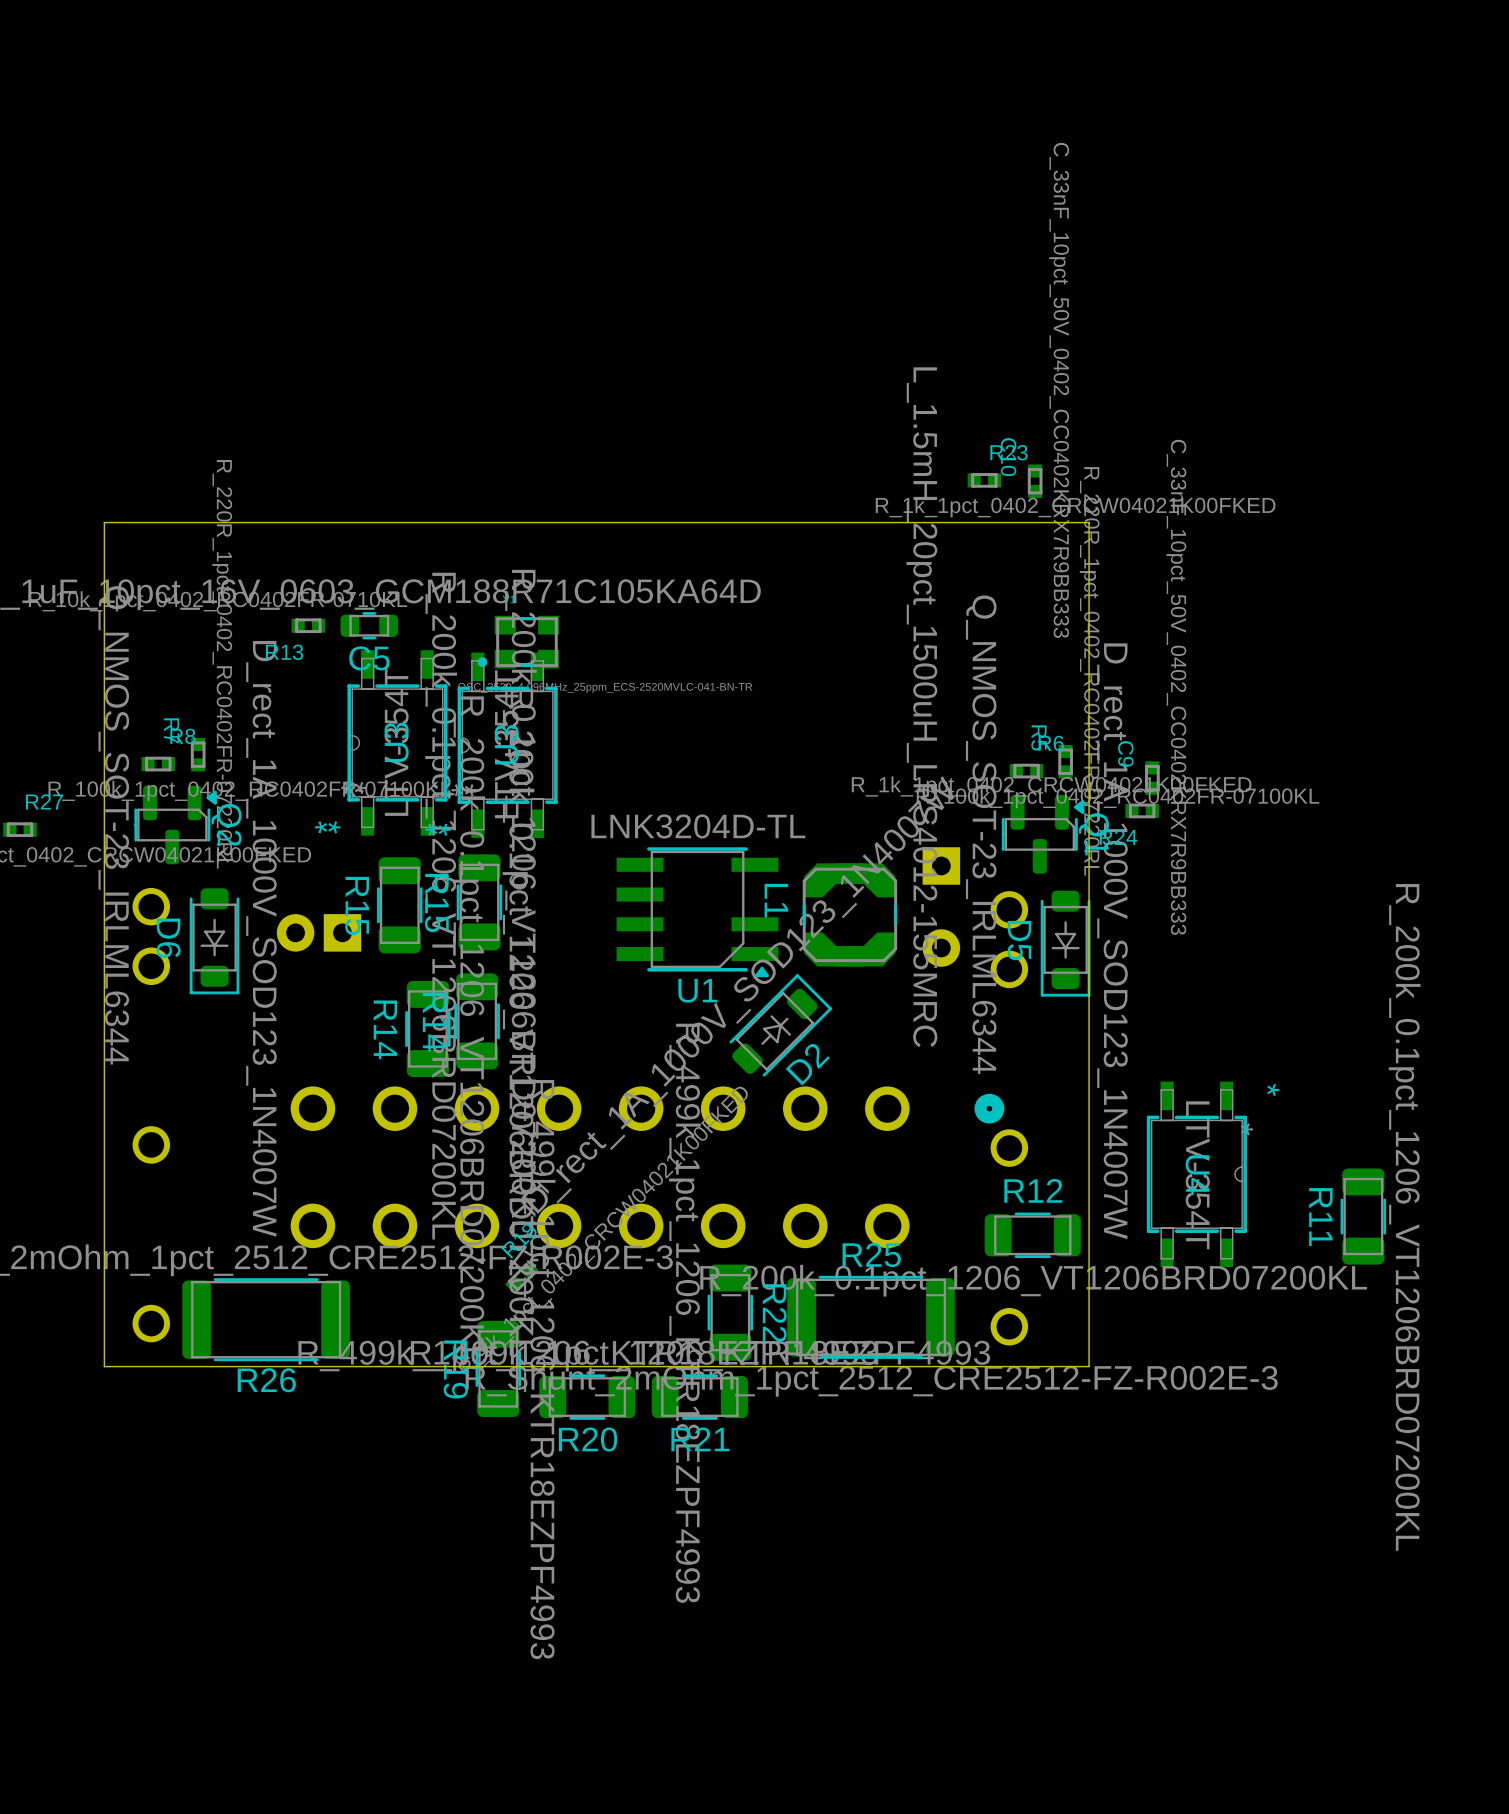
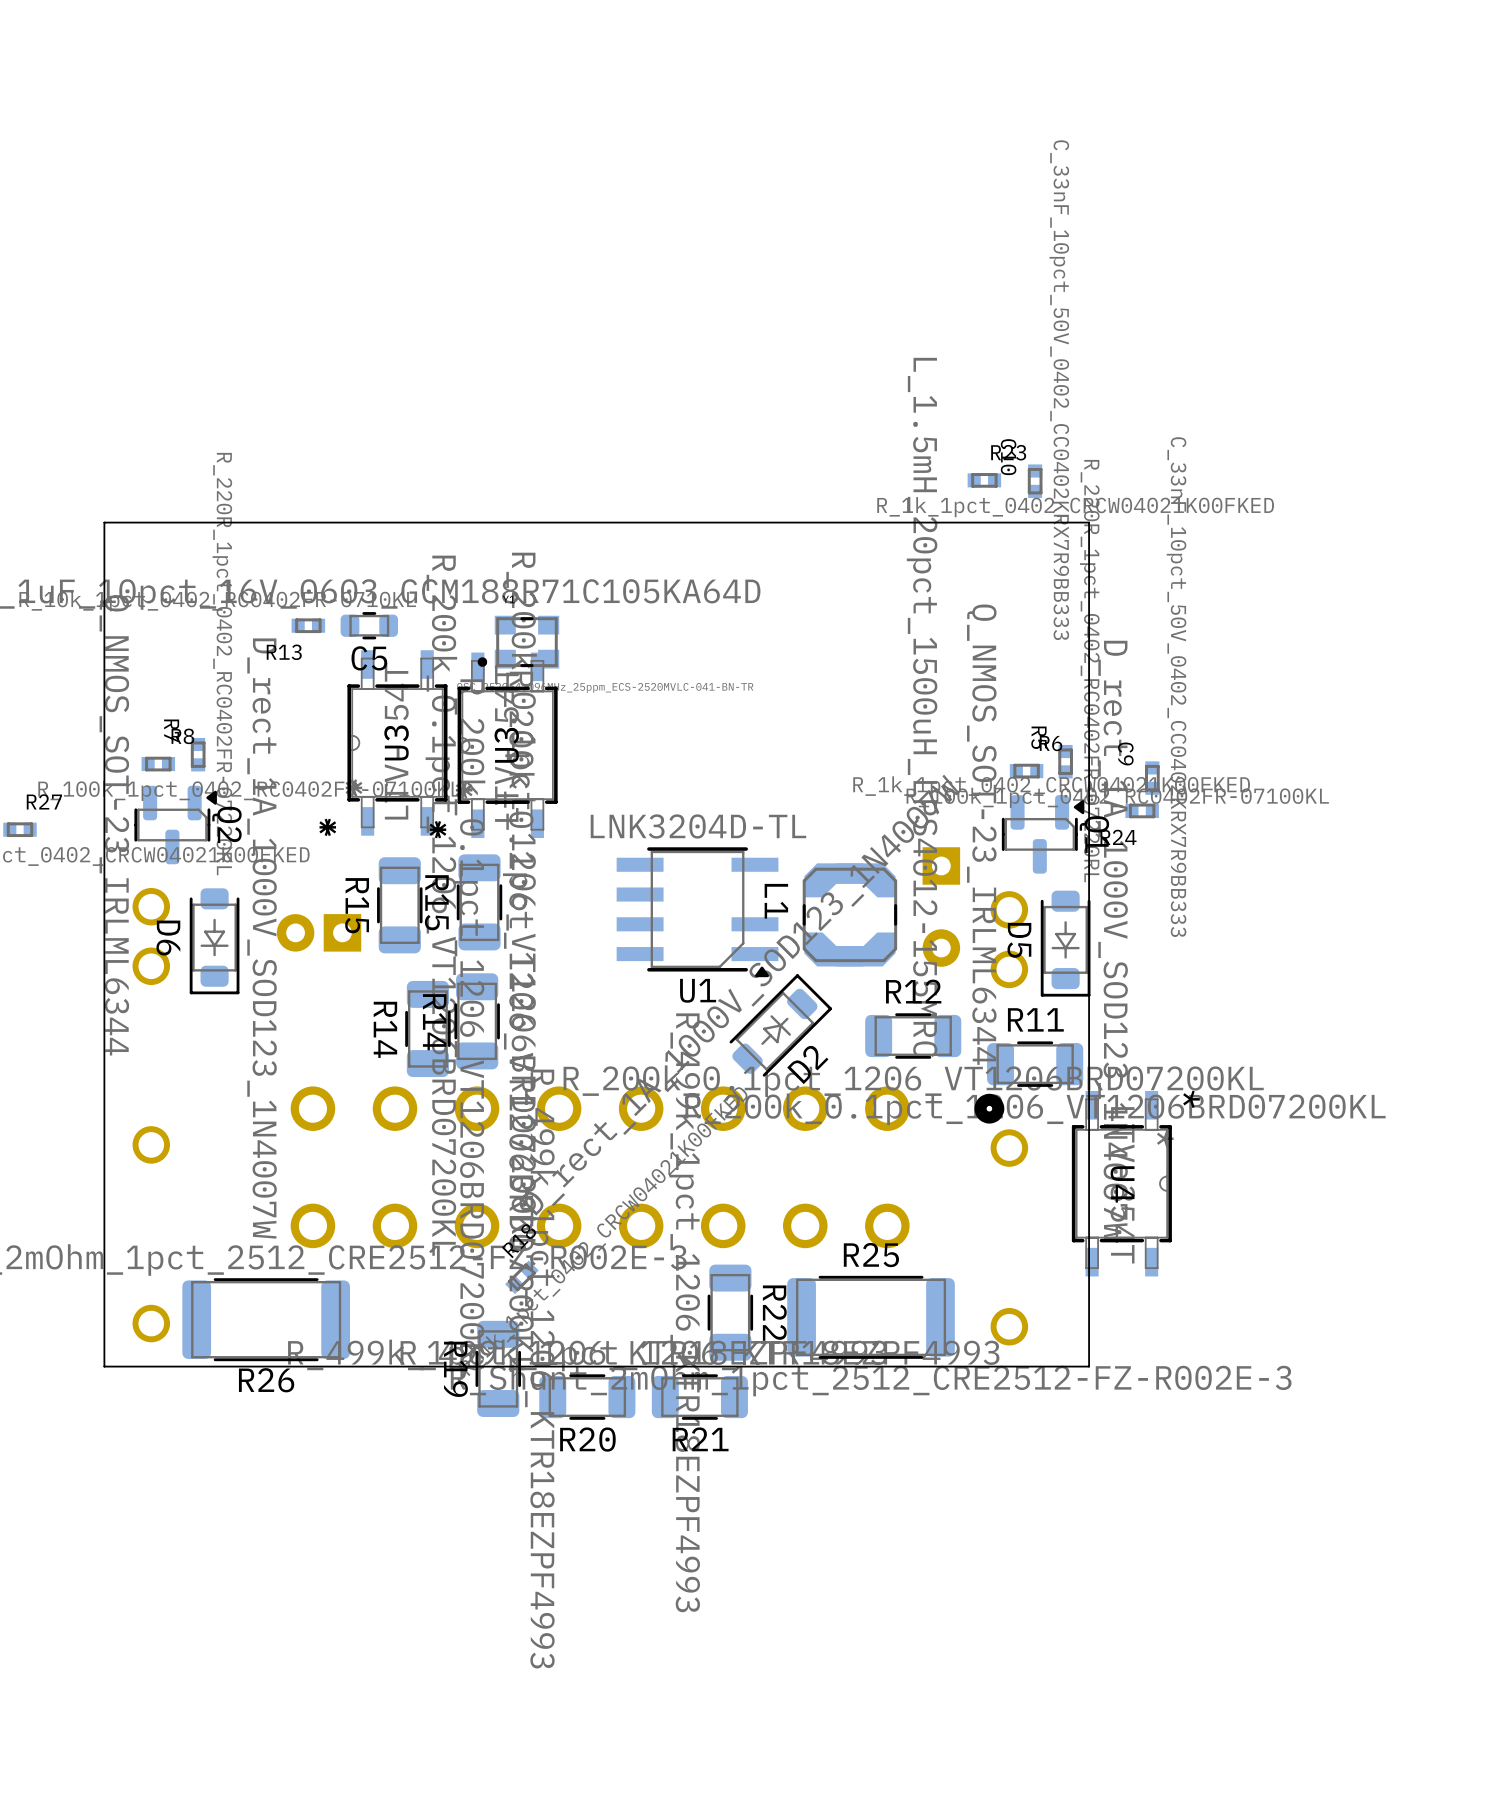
U4 position: (1196, 1174) -> (1121, 1183)
R11 rotation: 0° (1363, 1216) -> 90° clockwise (1035, 1064)
R11 position: (1363, 1216) -> (1035, 1064)
R12 position: (1032, 1235) -> (913, 1036)

